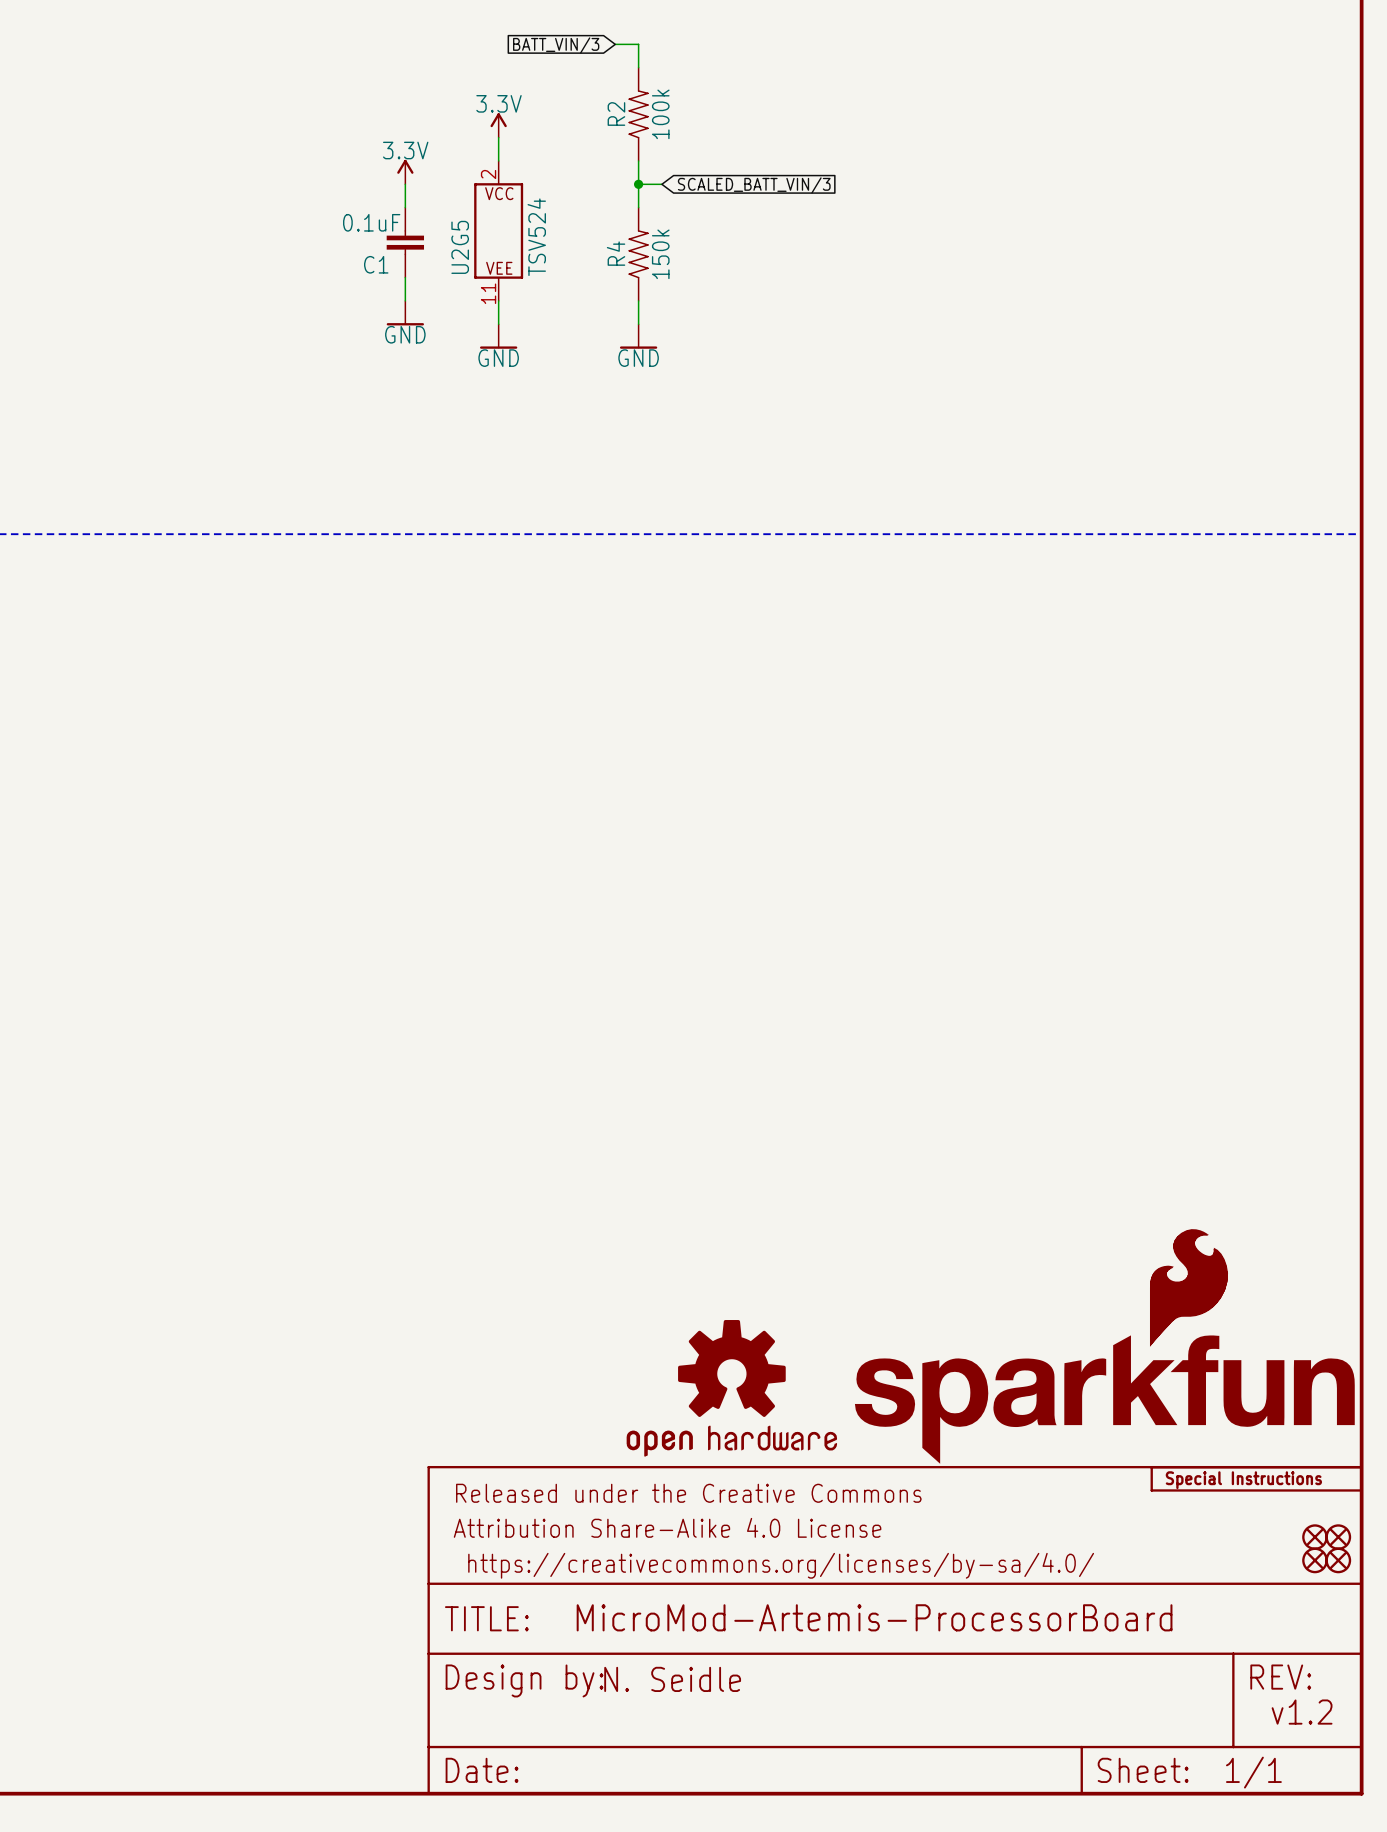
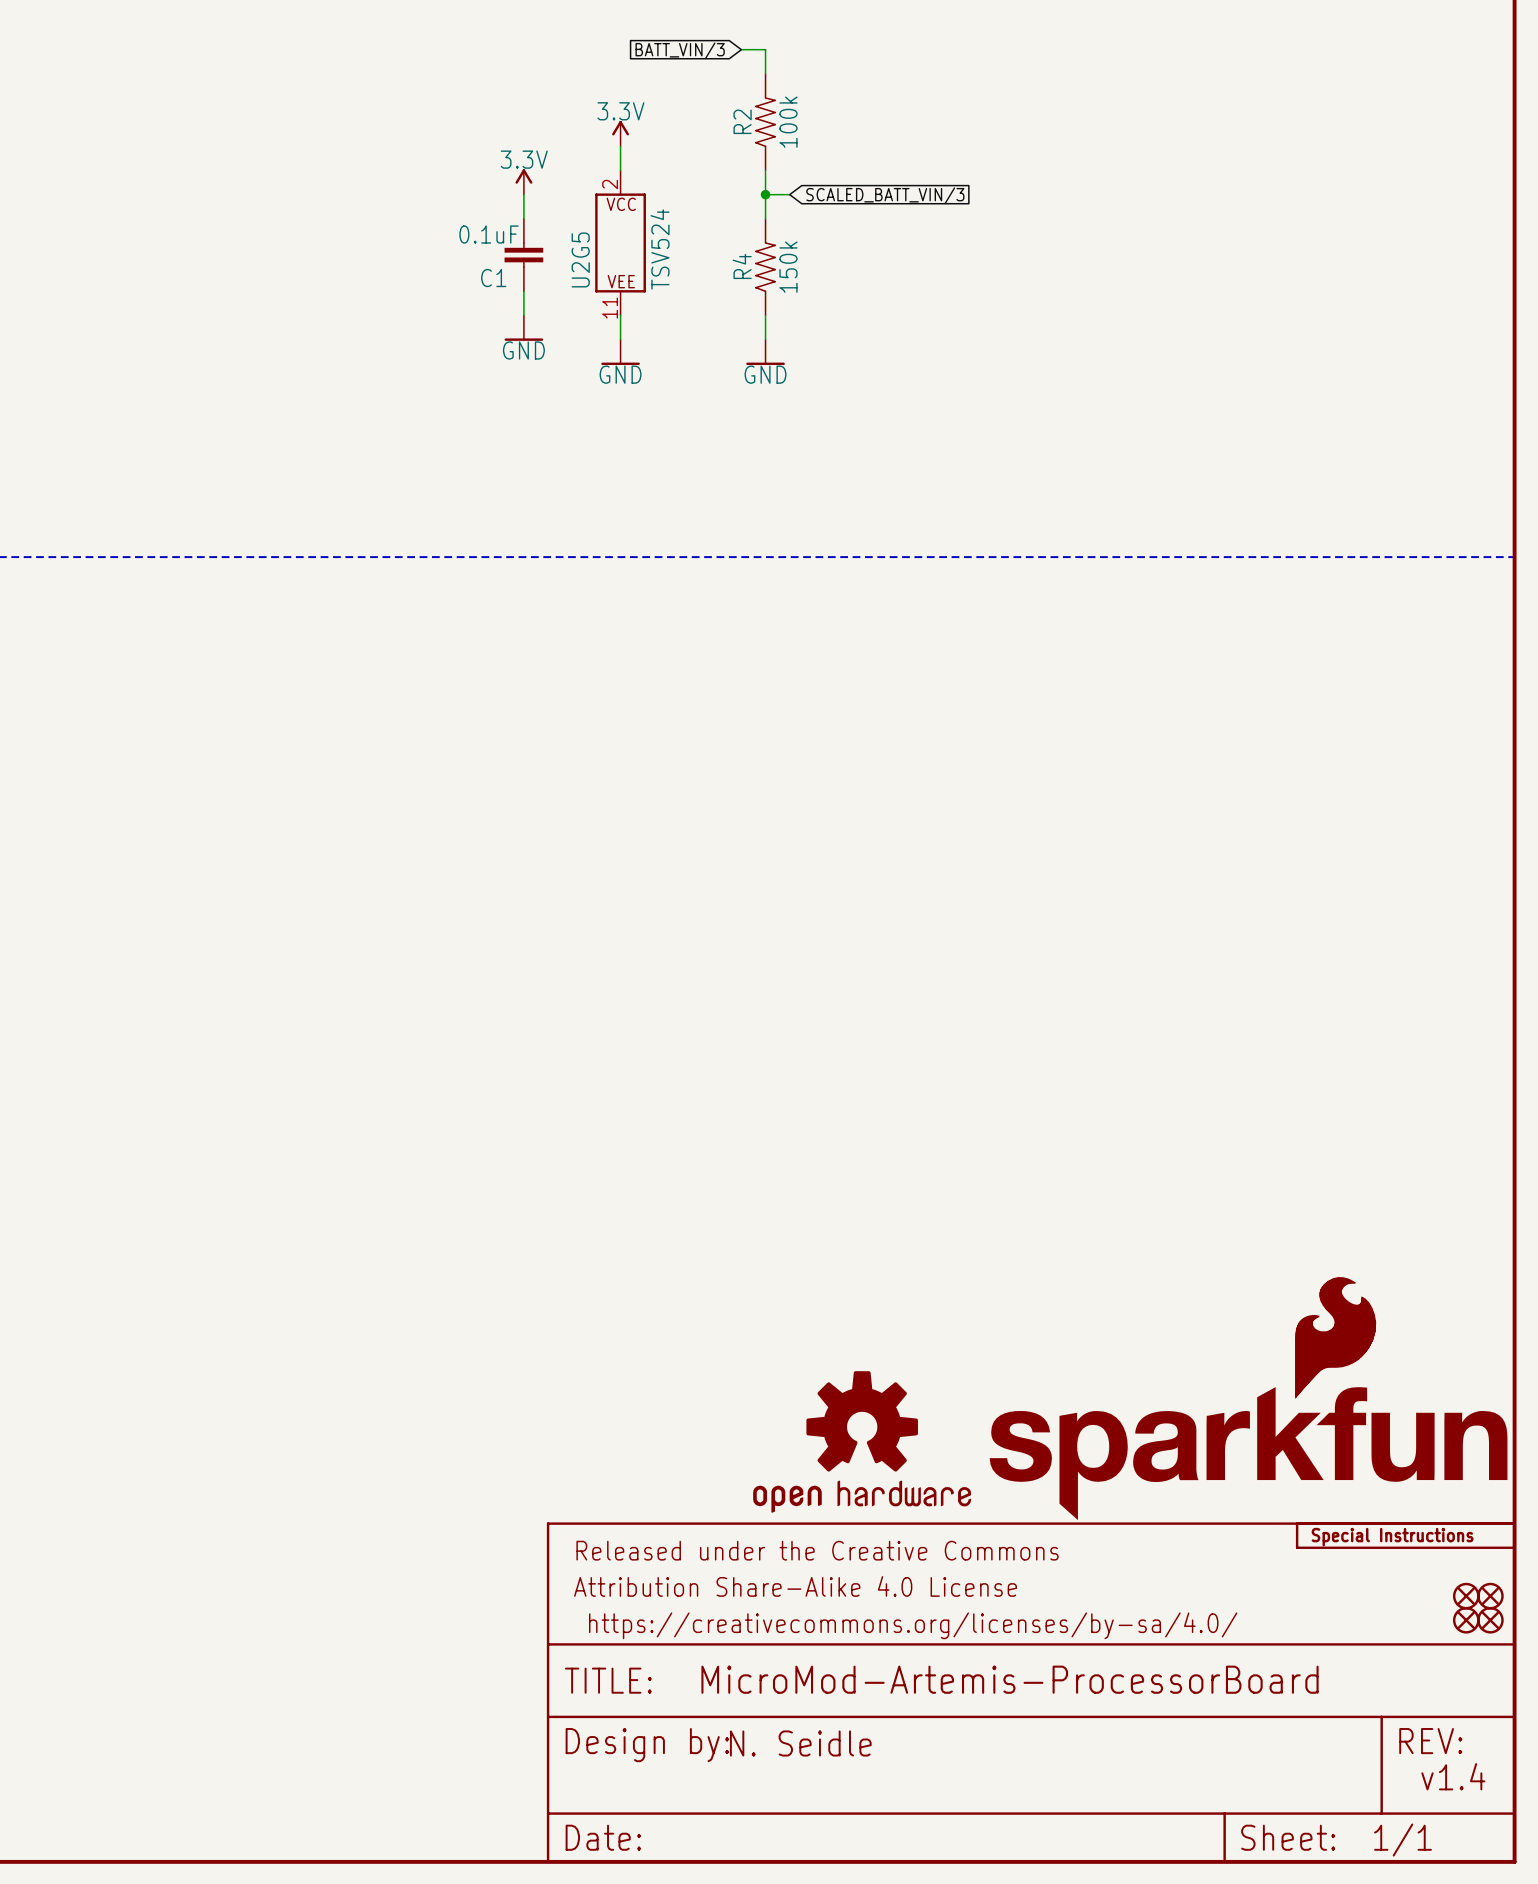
text: v1.2 (1302, 1712) -> v1.4 (1453, 1776)

